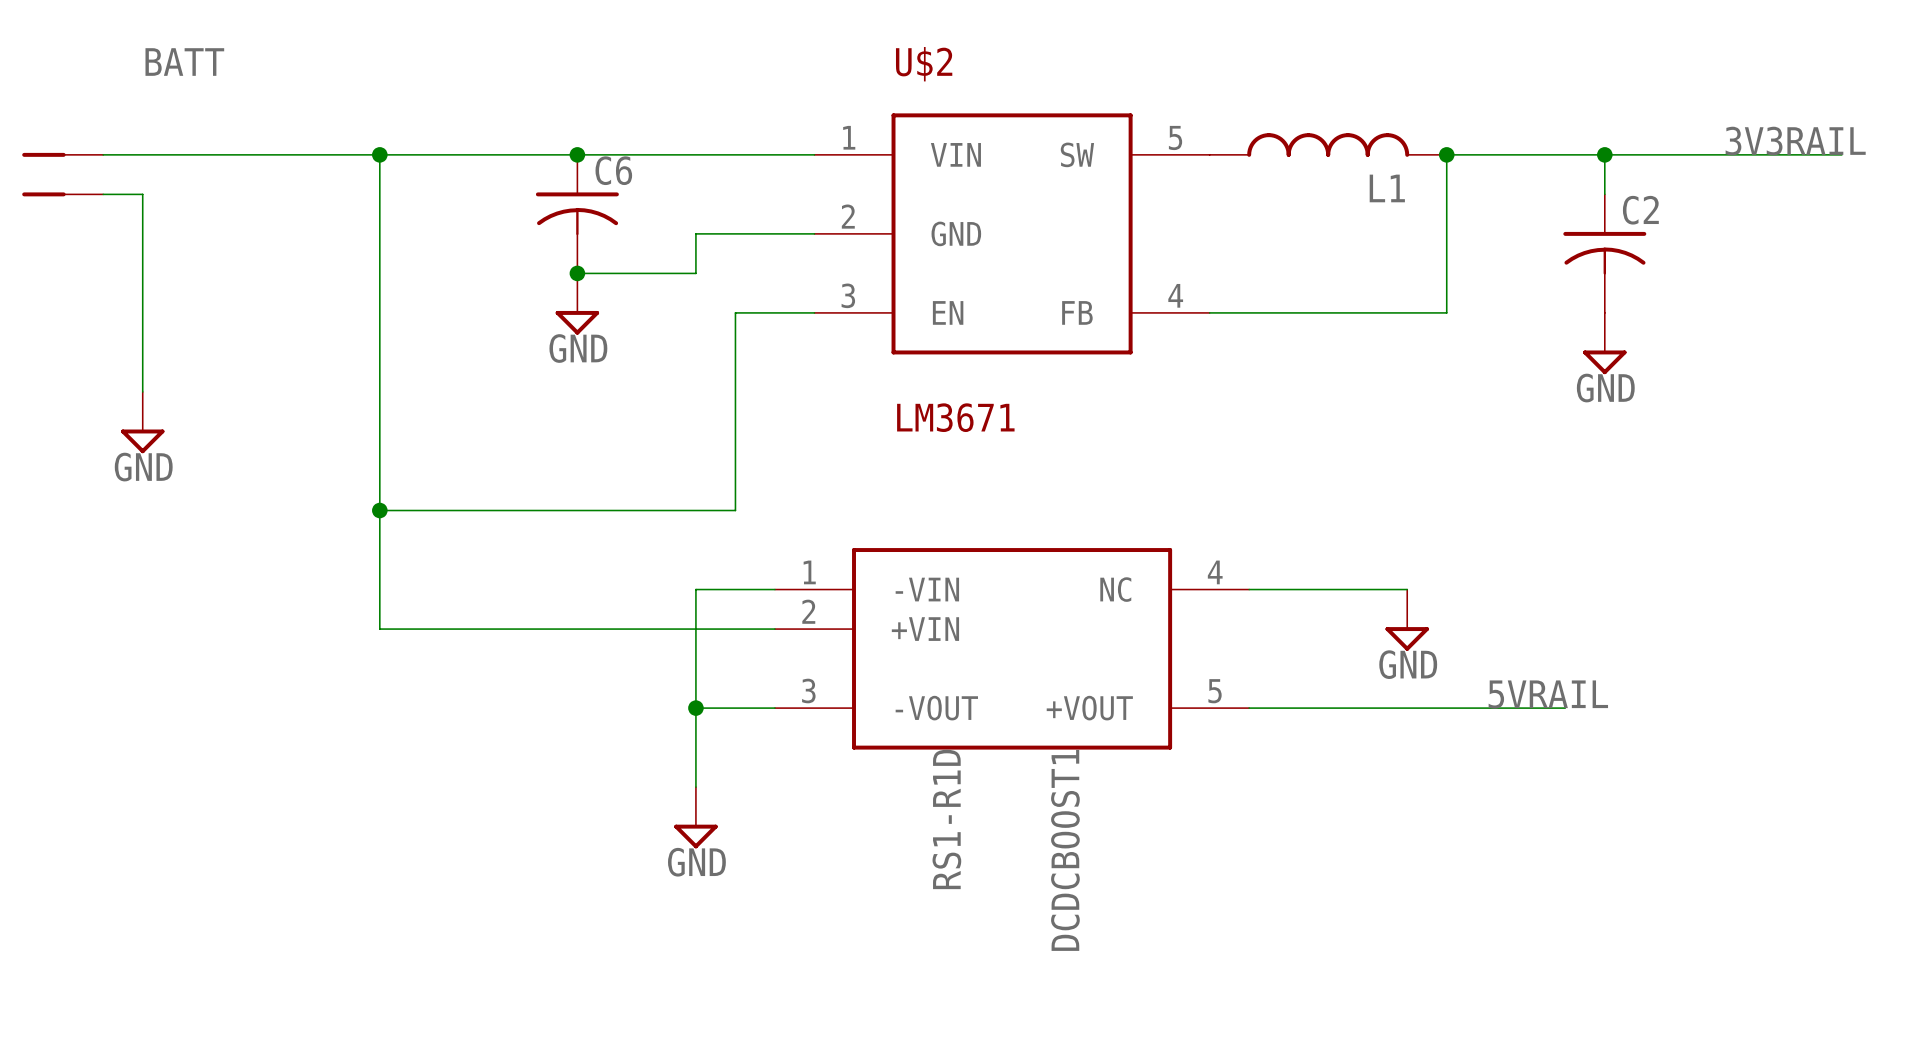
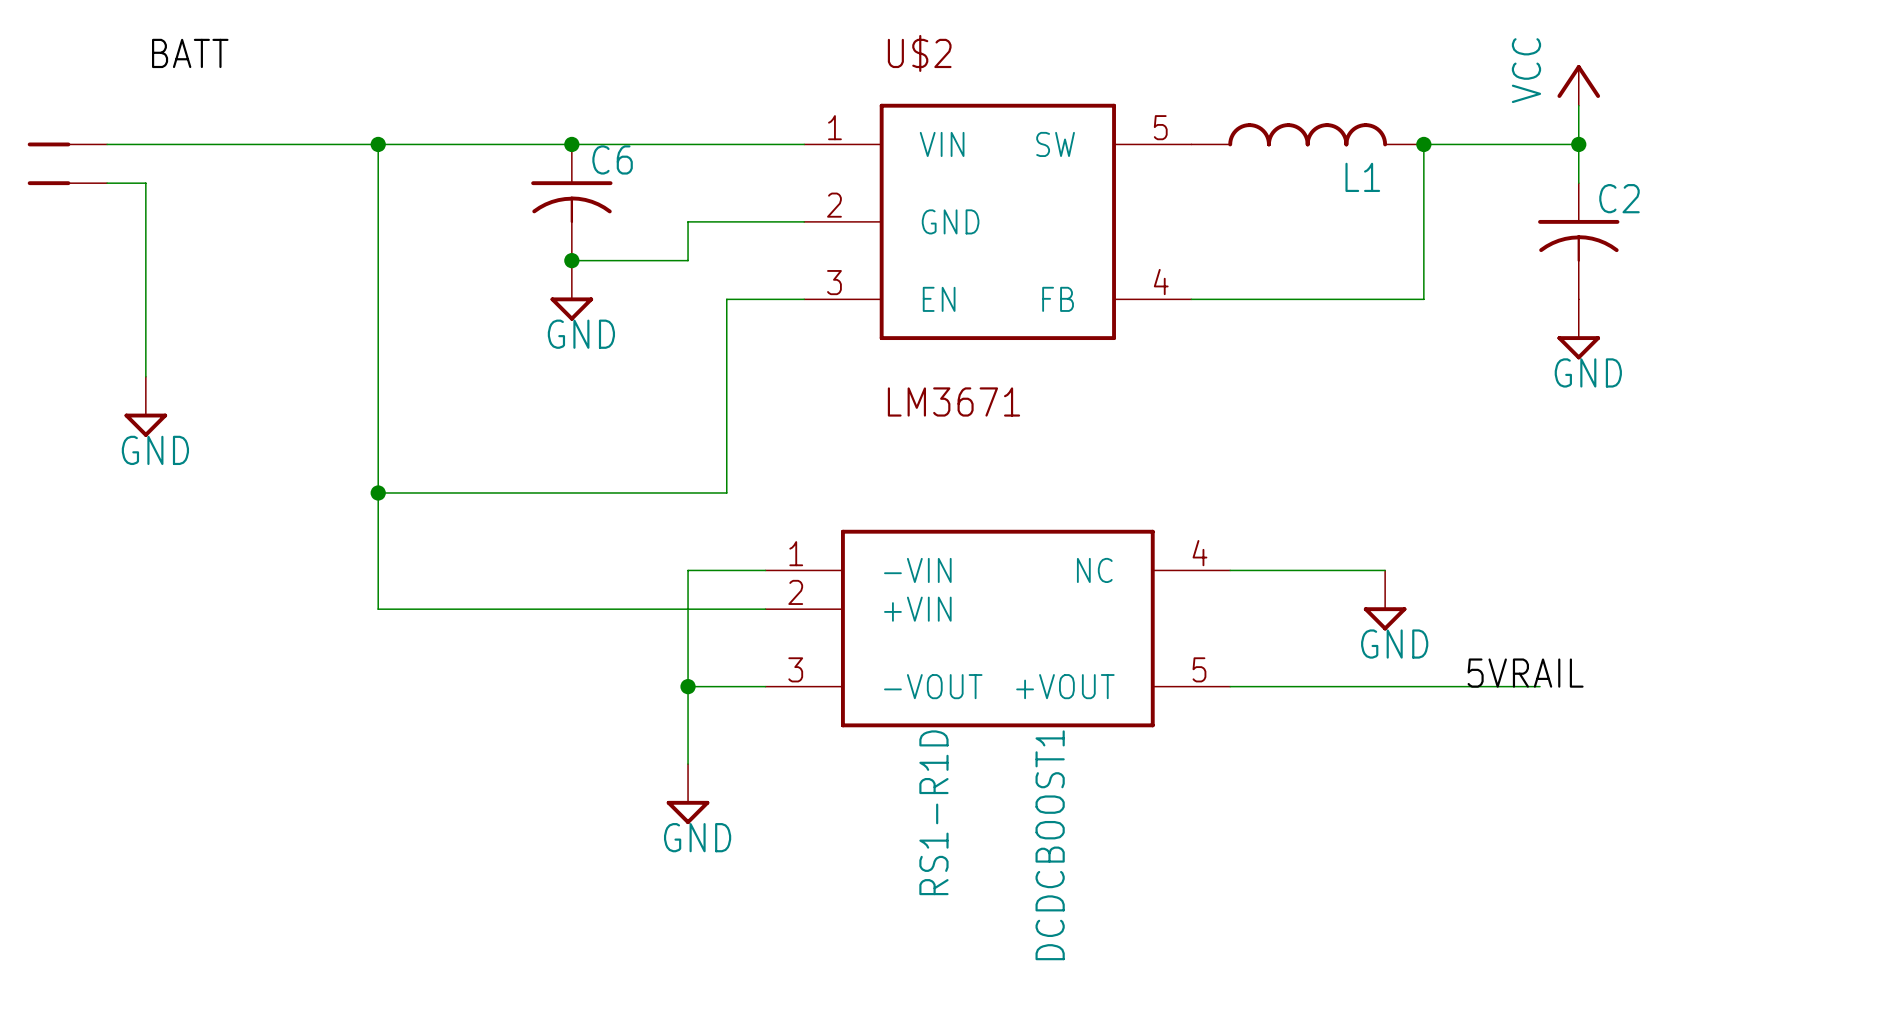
power symbol: none -> VCC (1578, 85)
label: 3V3RAIL (1795, 141) -> none
wire: (1604, 154) (1841, 154) -> (1578, 144) (1578, 105)

